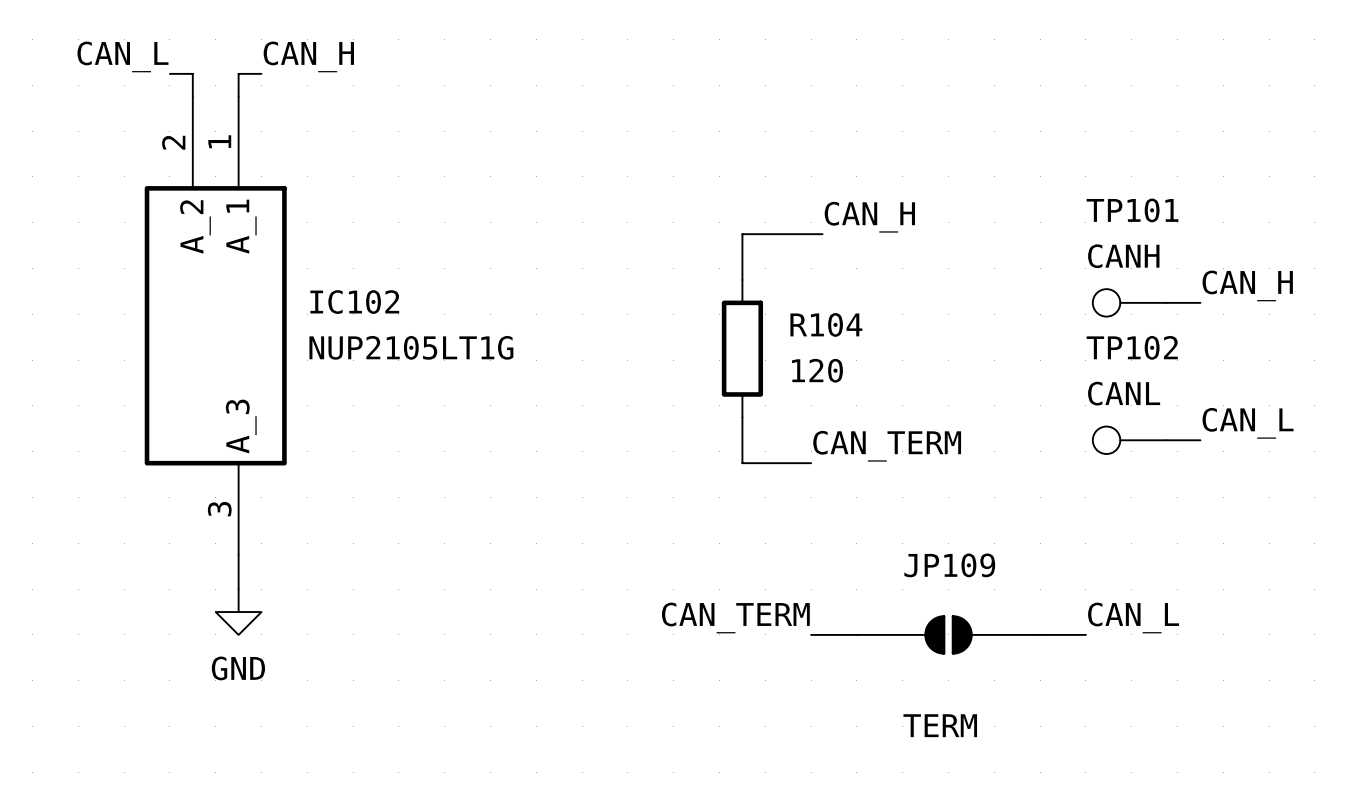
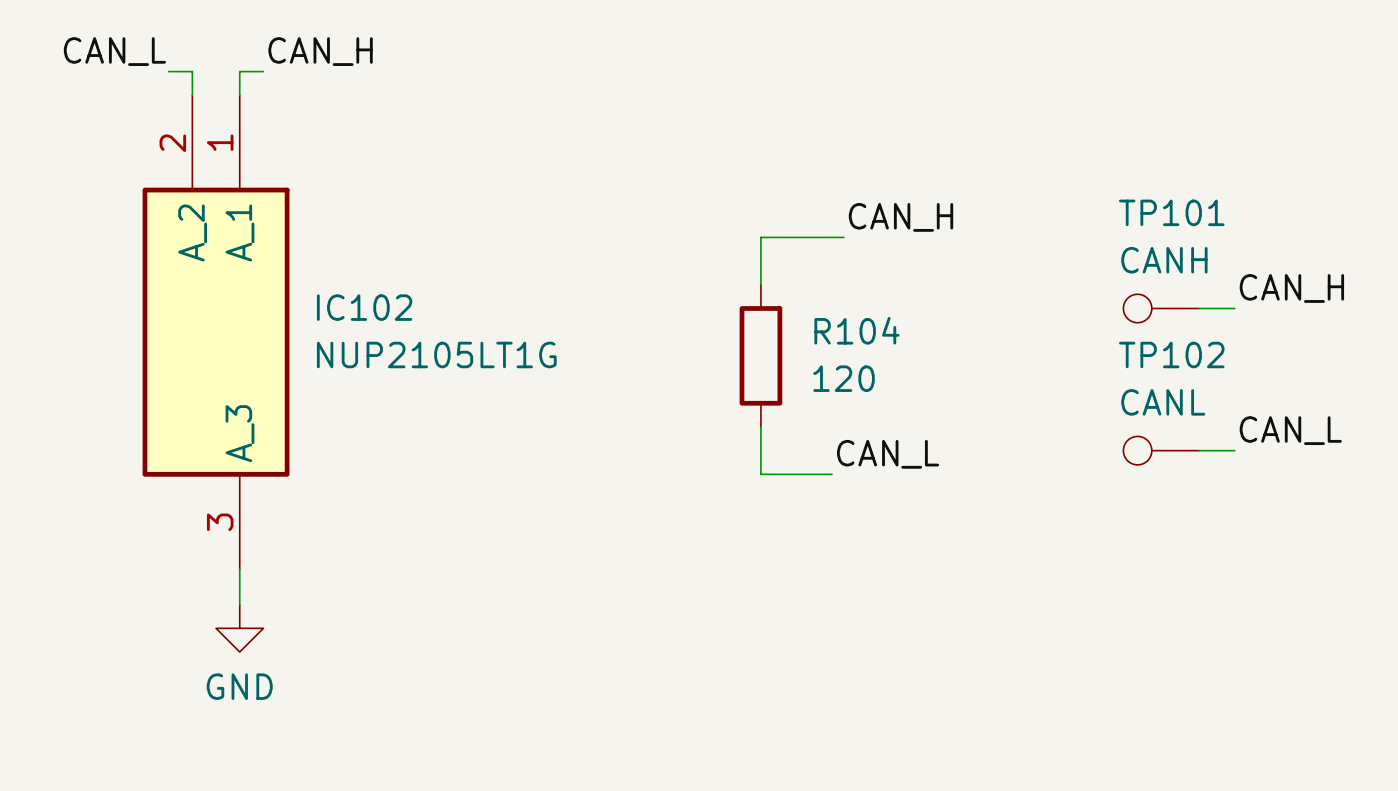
label: CAN_TERM (887, 446) -> CAN_L (888, 454)
label: CAN_TERM (735, 617) -> none
label: CAN_L (1133, 617) -> none
wire: (811, 634) (856, 634) -> none
JP109: TERM (948, 634) -> none
wire: (1040, 634) (1085, 634) -> none

